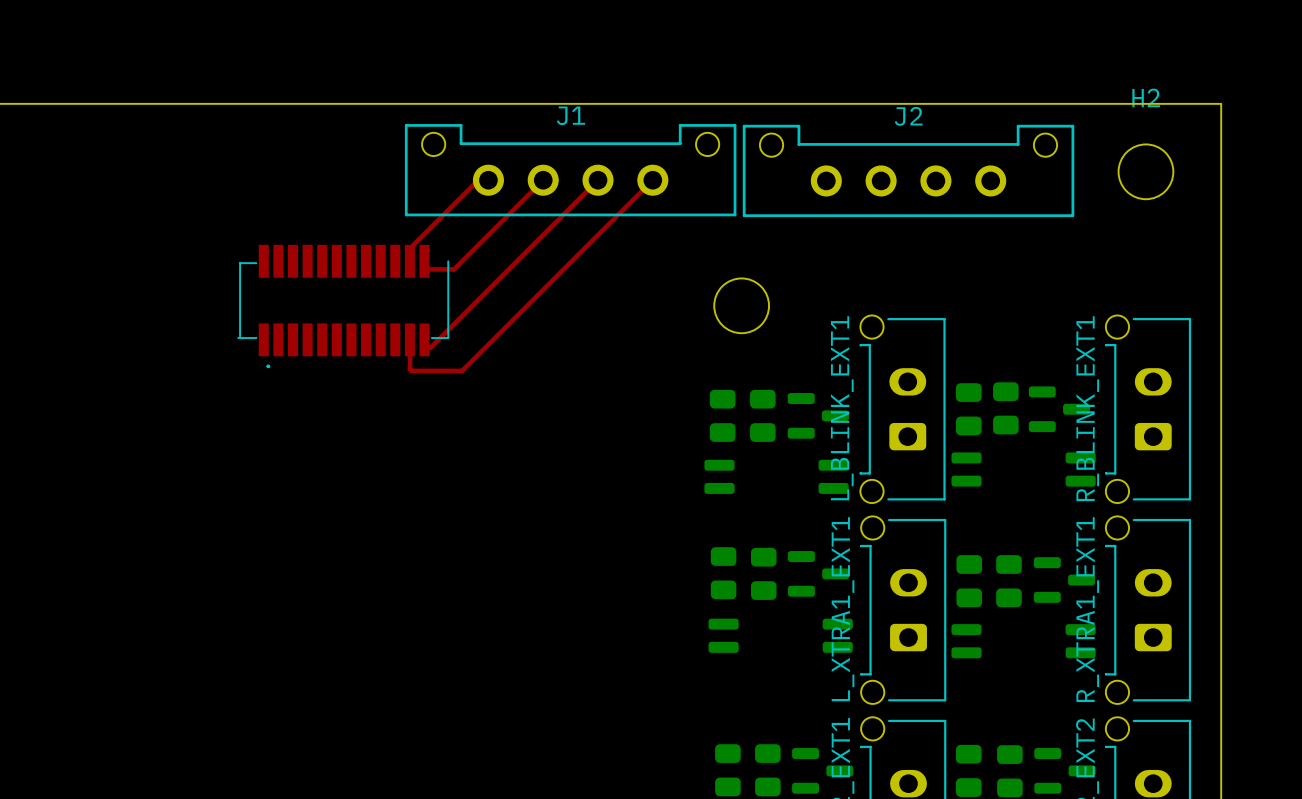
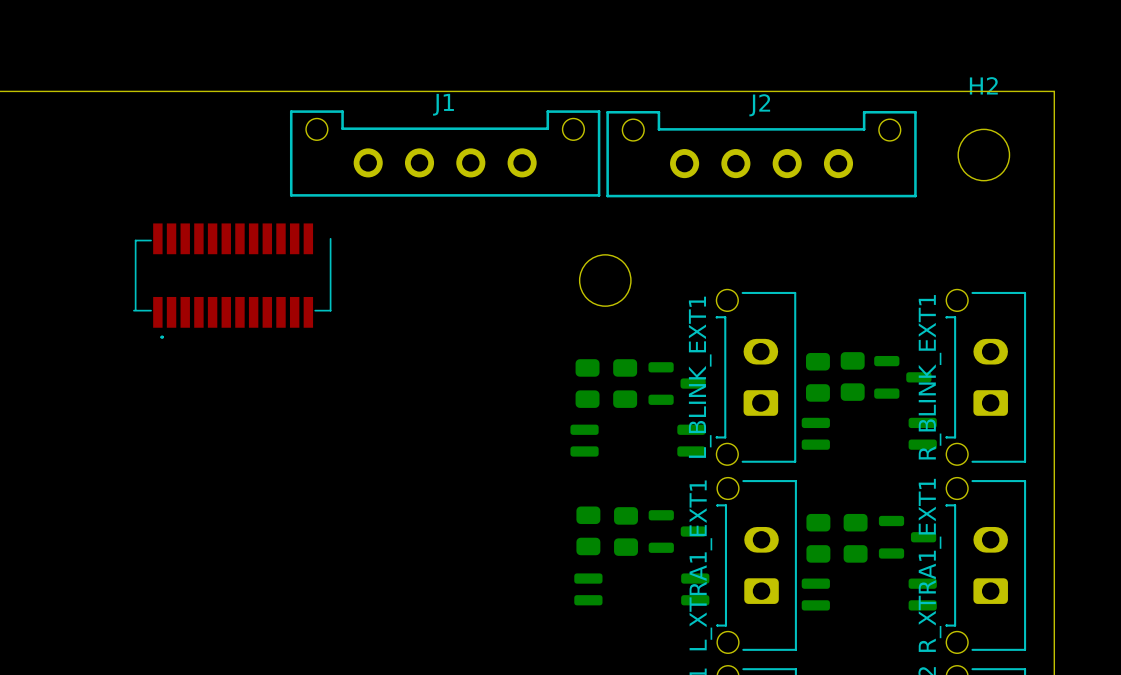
top track: (488, 180) (478, 180) (410, 248) (410, 269) -> none
top track: (543, 180) (454, 269) (424, 269) -> none
top track: (598, 180) (430, 347) (424, 347) -> none
top track: (652, 180) (462, 370) (411, 370) (410, 368) (410, 347) -> none

